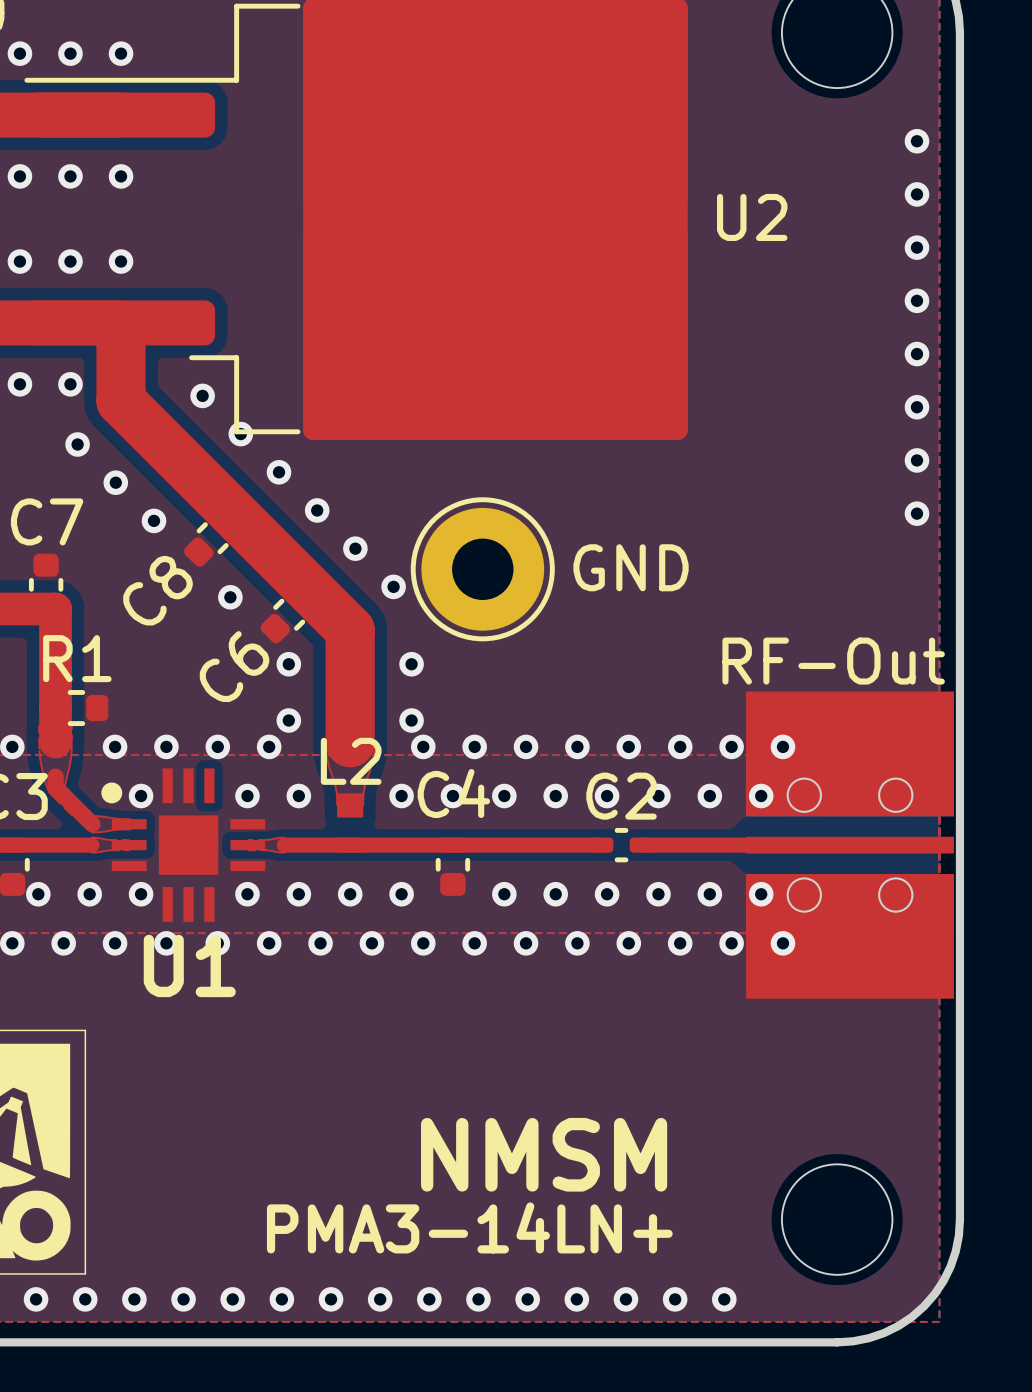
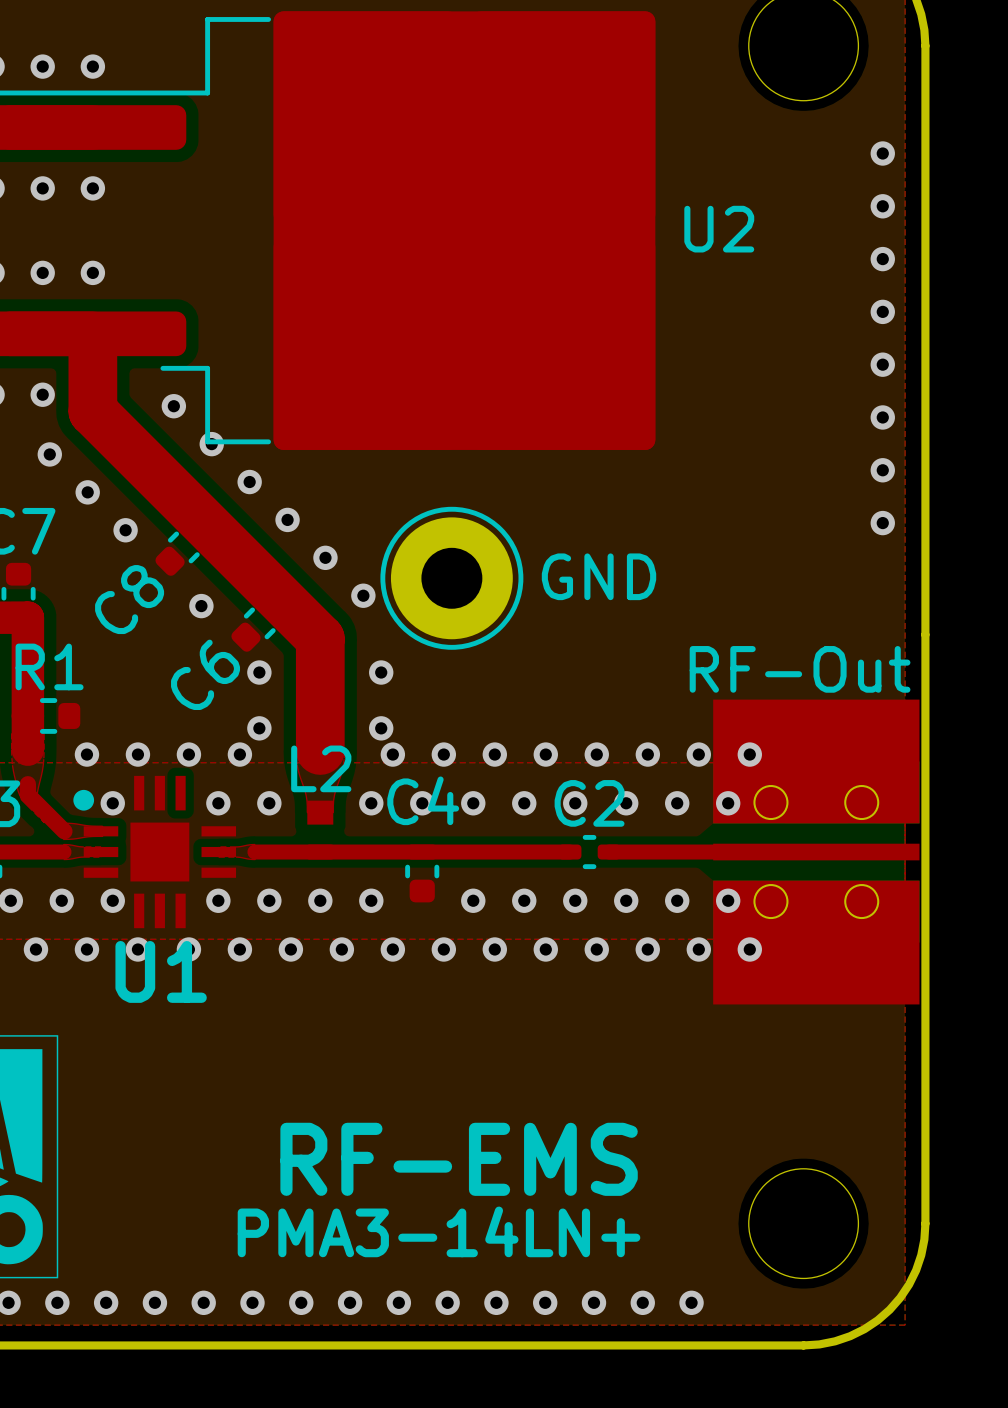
text: NMSM (544, 1154) -> RF-EMS (459, 1159)

